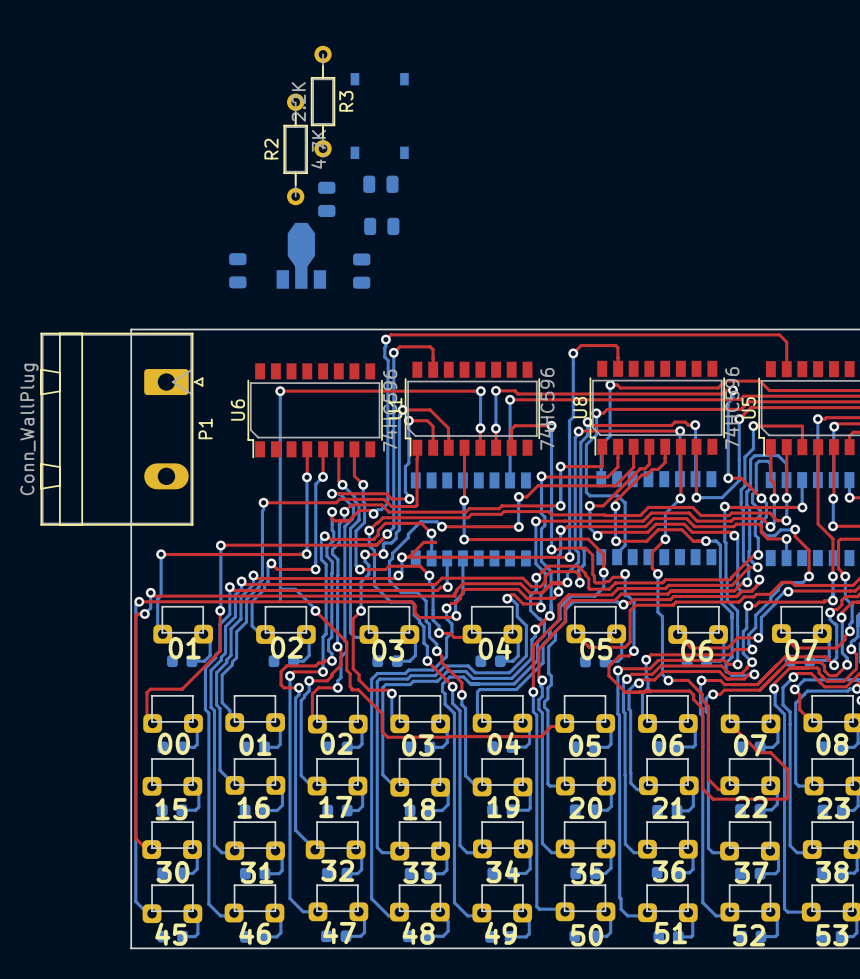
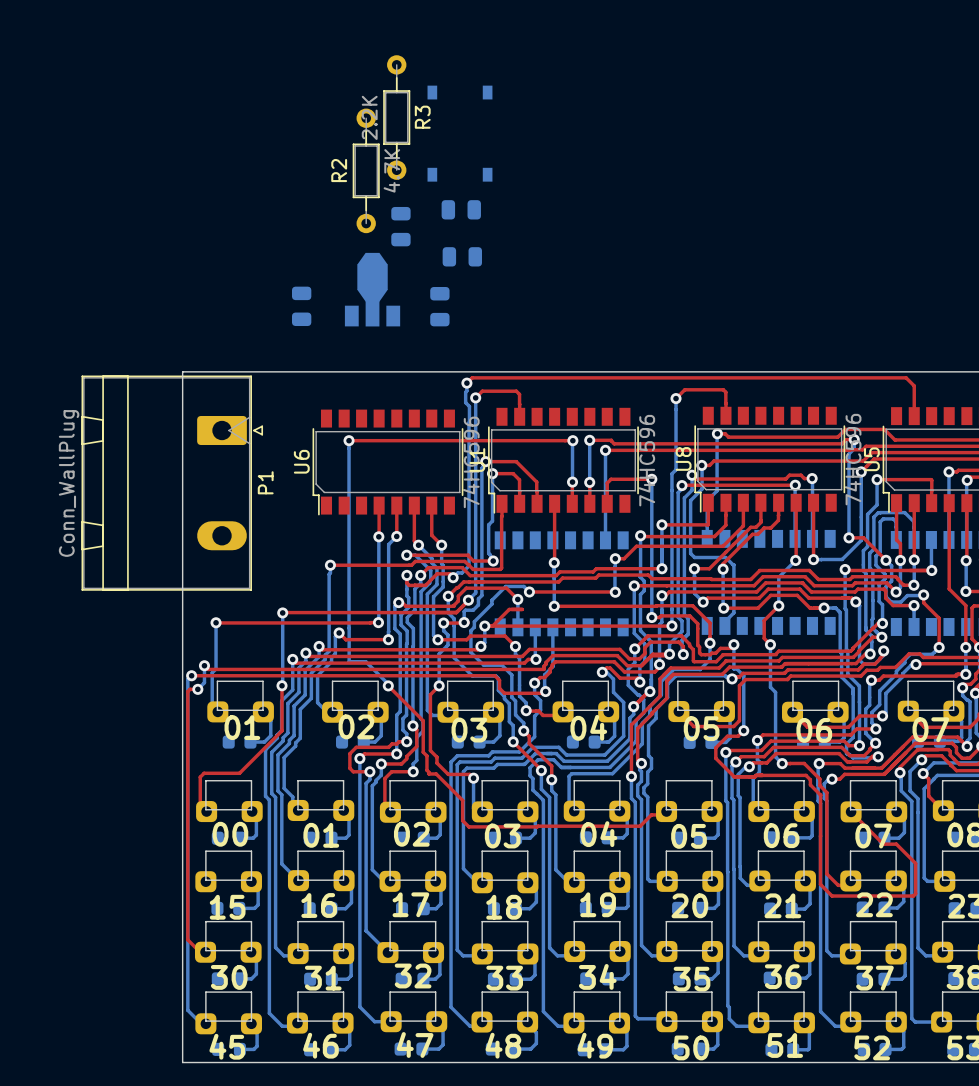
bottom track: (280, 589) (280, 601) -> none

